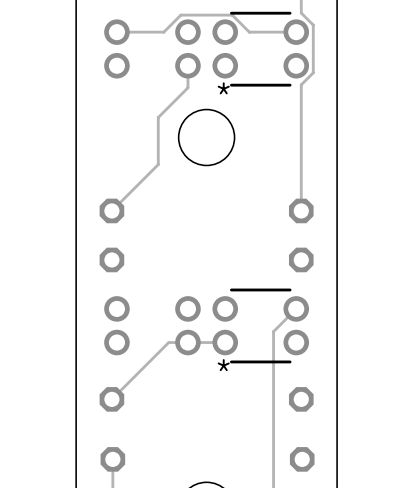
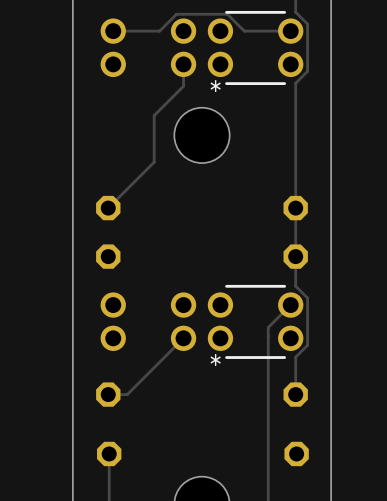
track: none -> (295, 208) (295, 286) (307, 298) (307, 345) (295, 357) (295, 394)
track: (225, 342) (168, 342) (111, 399) -> (183, 338) (127, 394) (108, 394)

